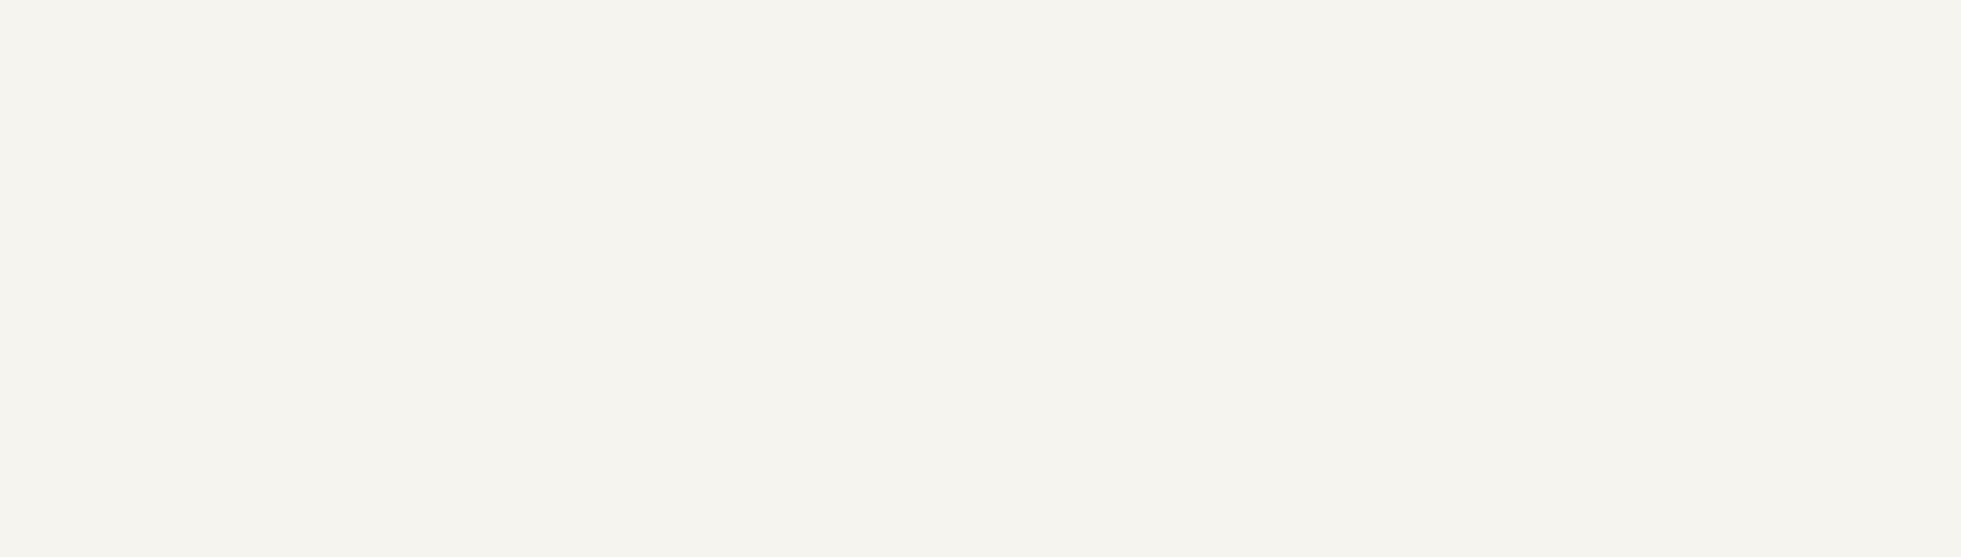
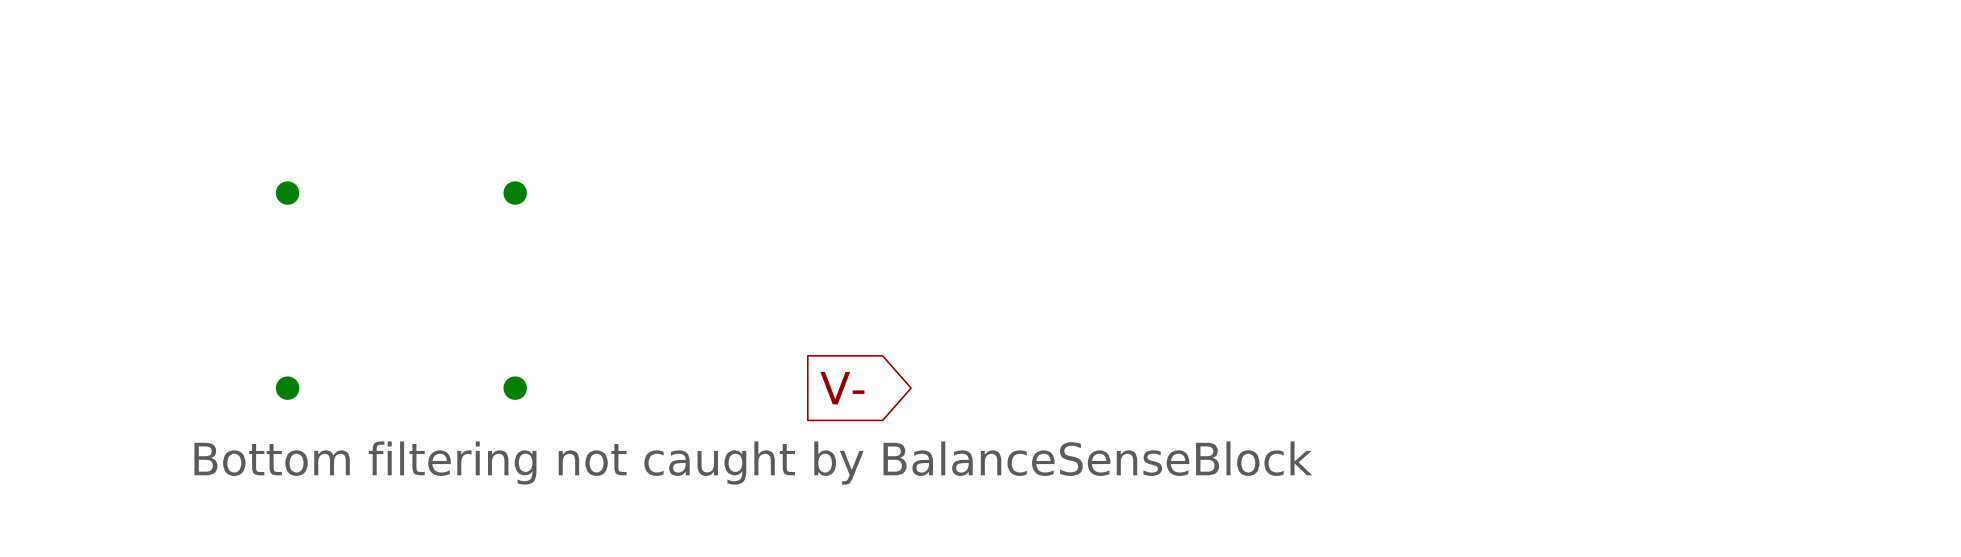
junction: none -> (287, 193)
junction: none -> (515, 193)
junction: none -> (287, 388)
junction: none -> (515, 388)
global label: none -> V- (842, 388)
text: none -> Bottom filtering not caught by BalanceSenseBlock (753, 463)

